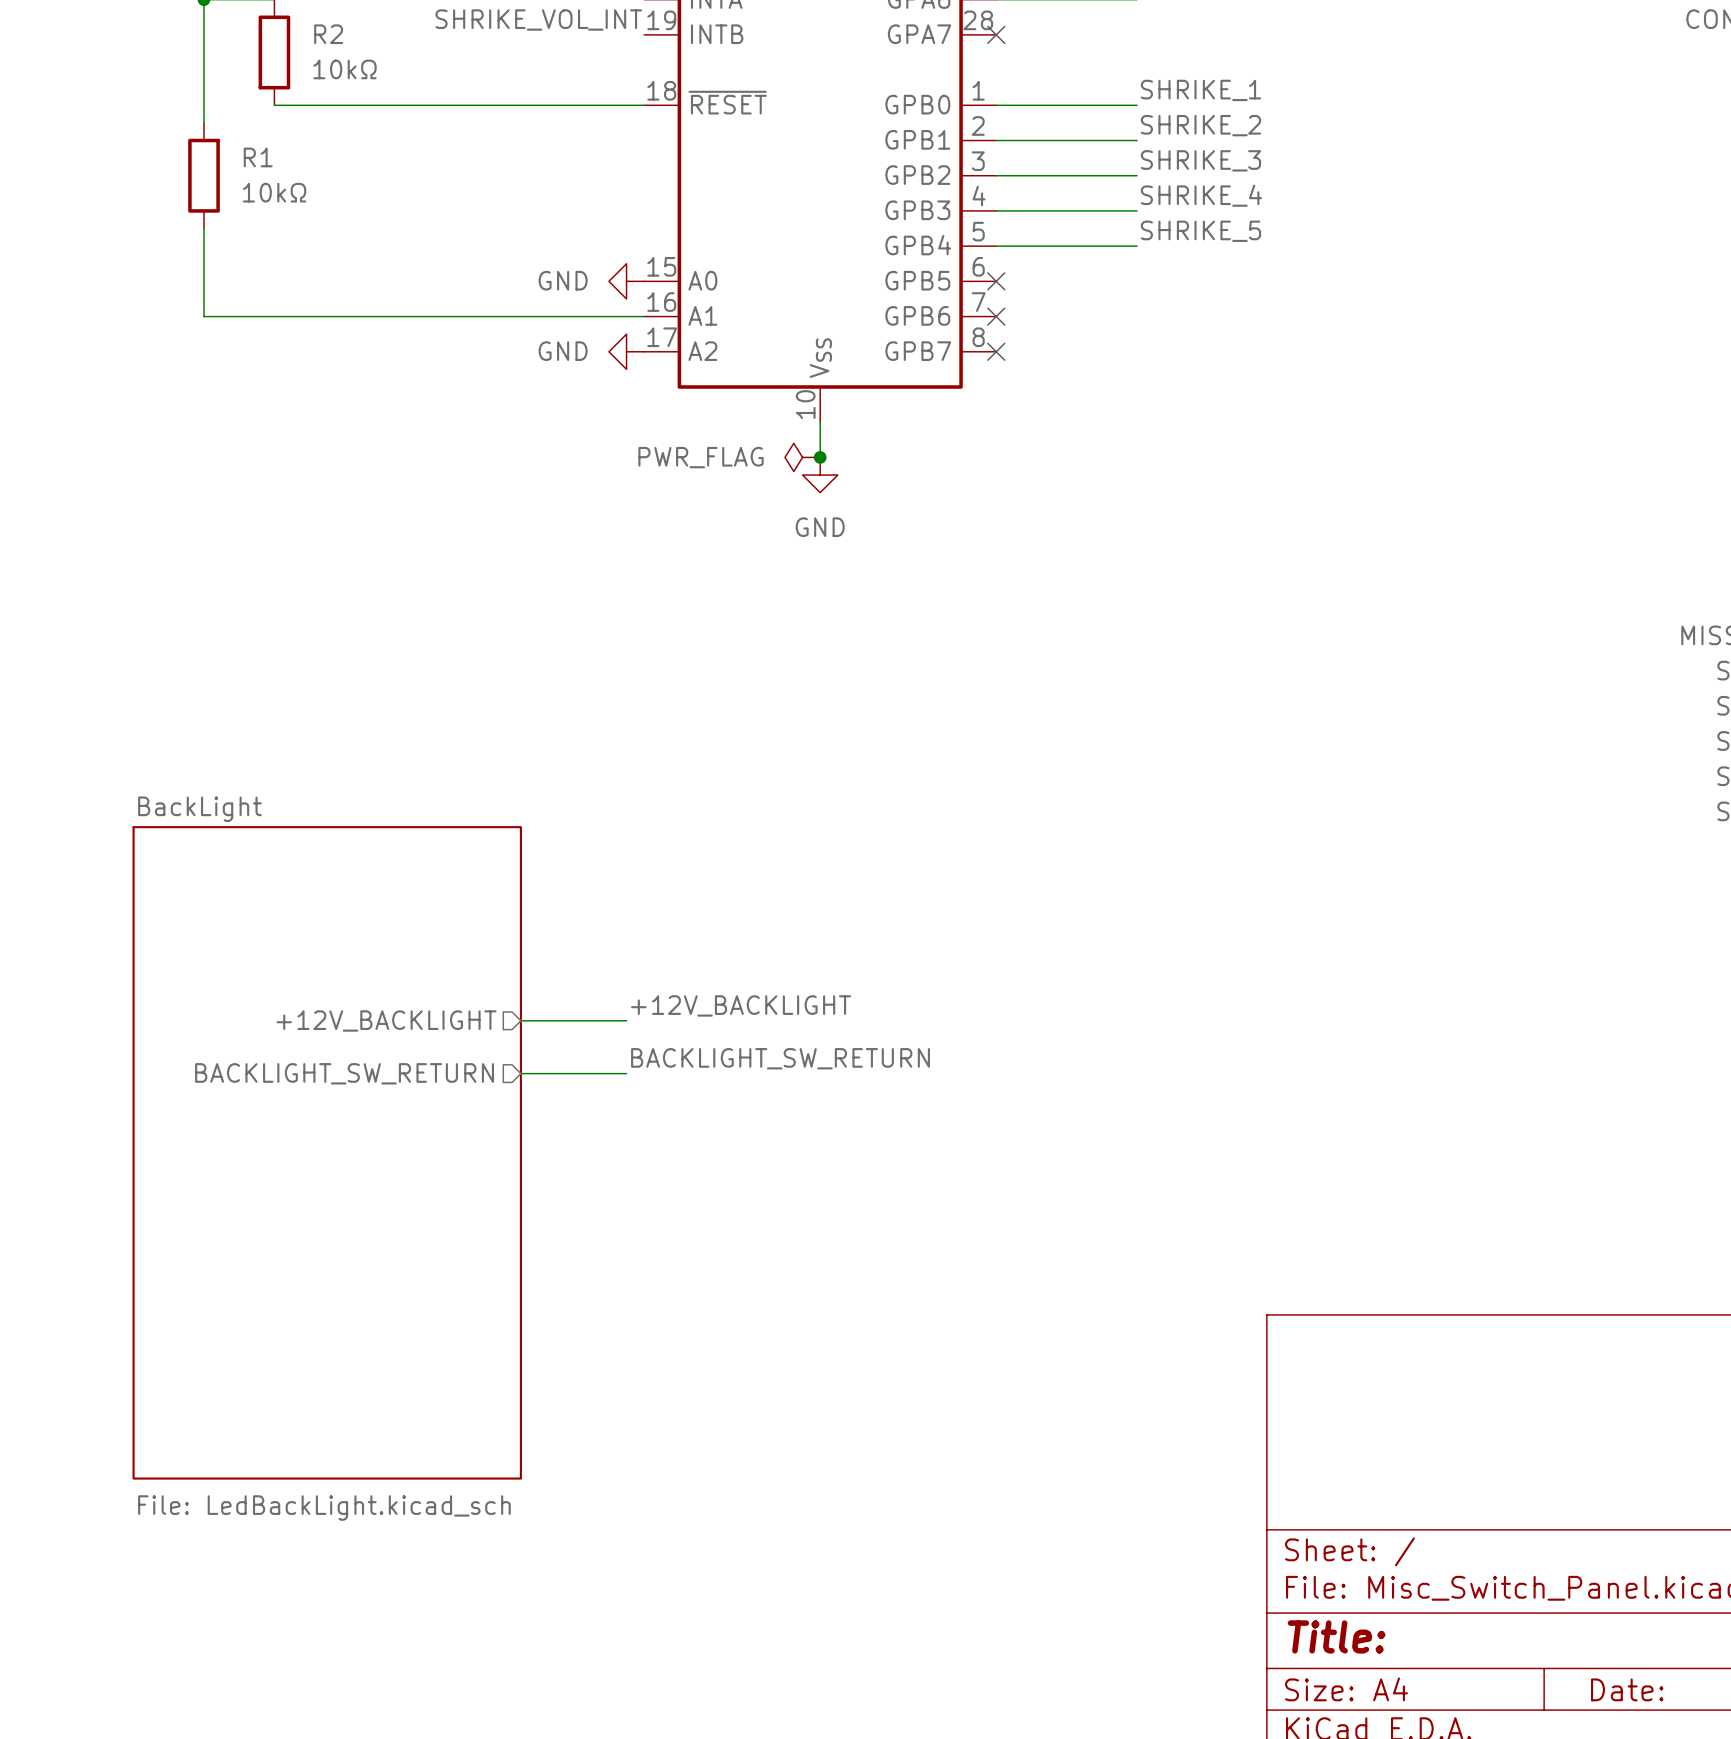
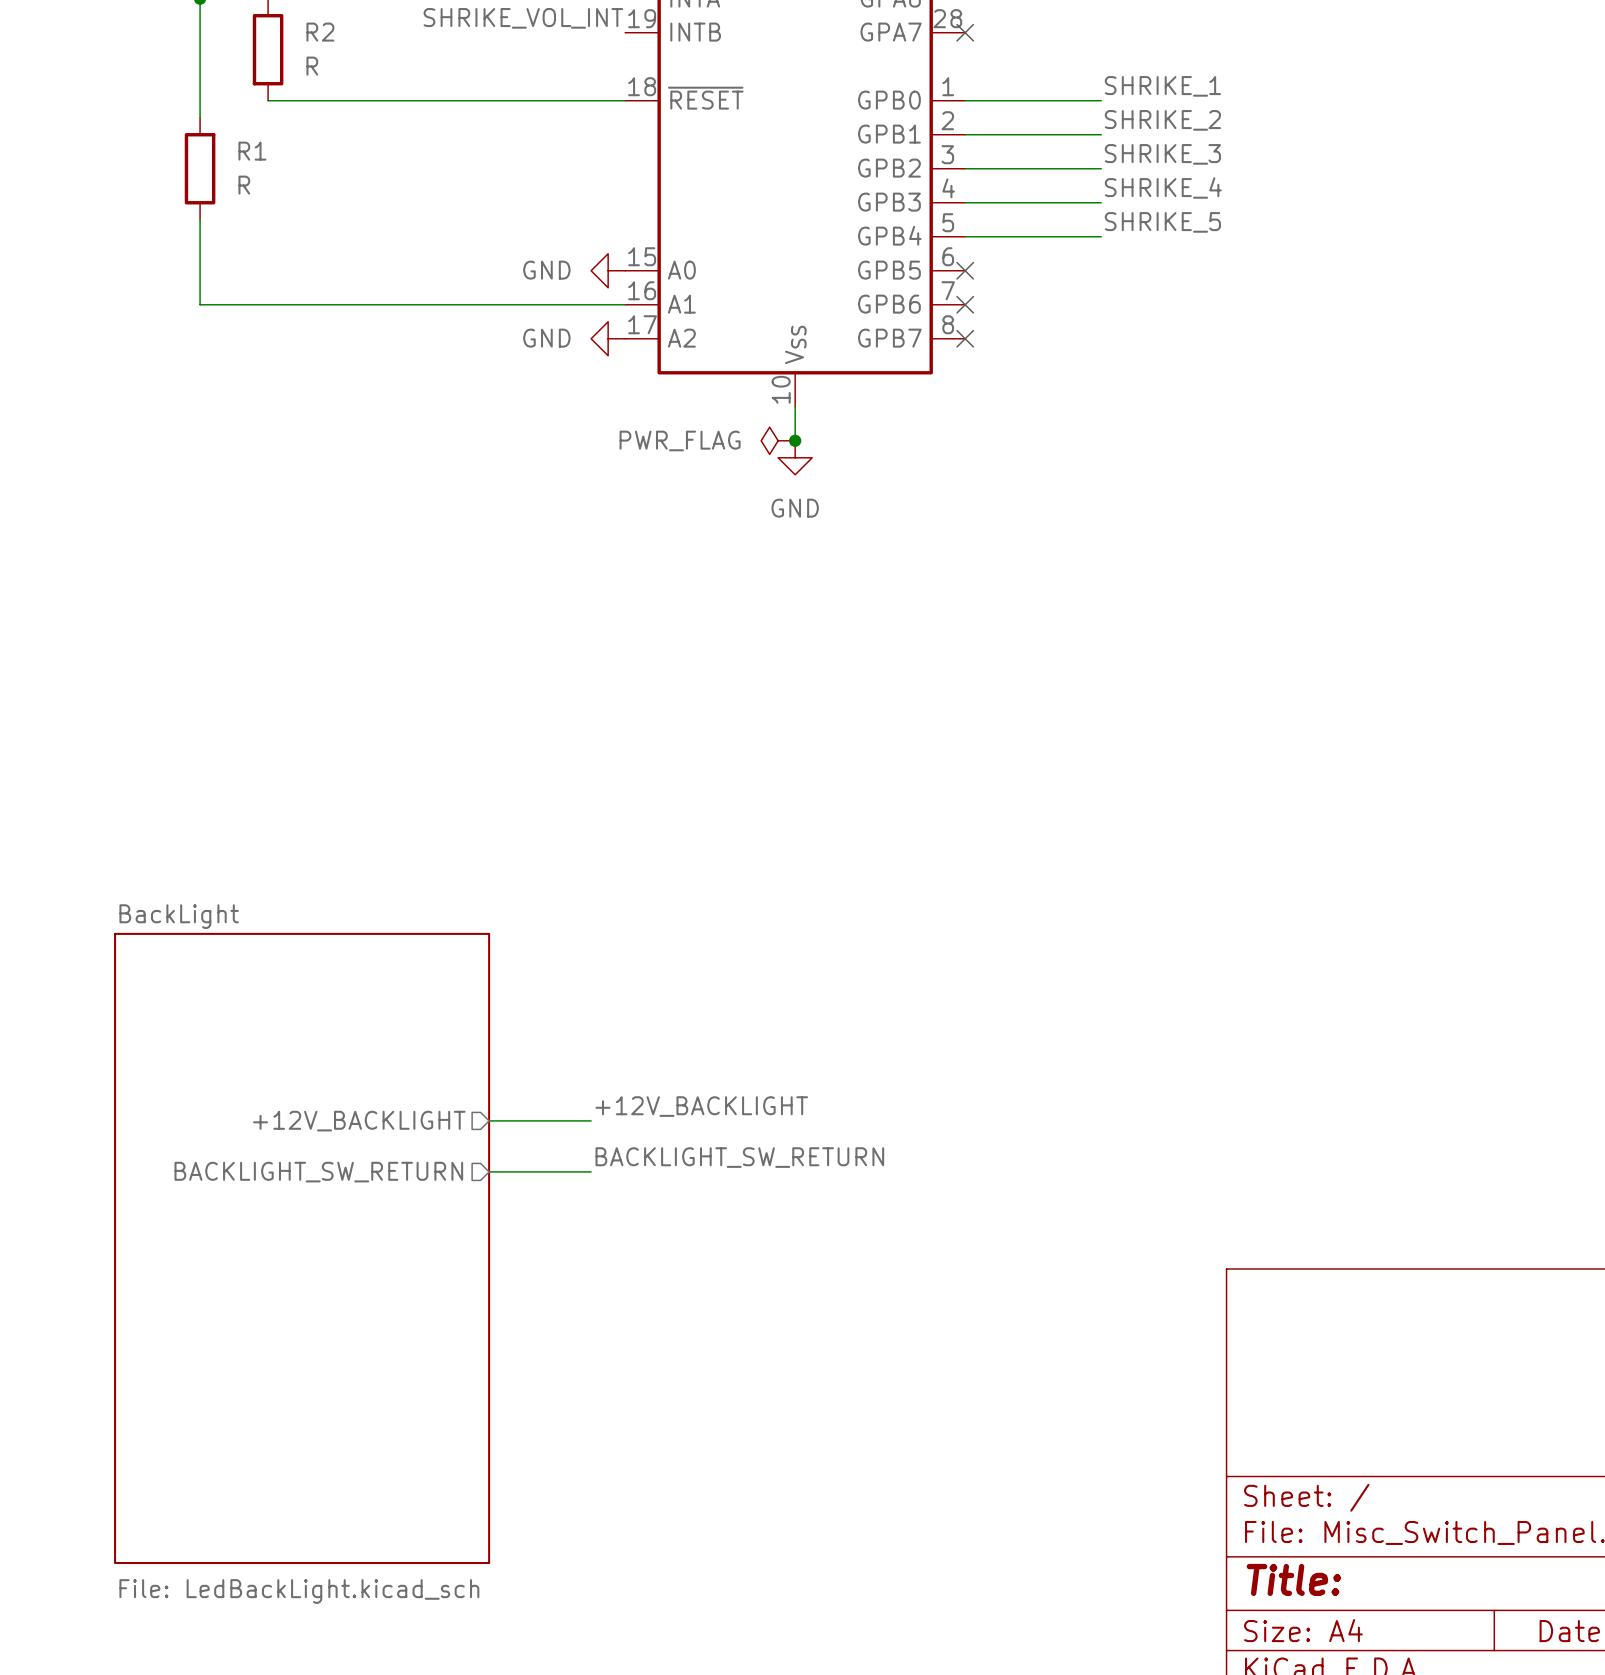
R2 value: 10kΩ (344, 69) -> R (312, 66)
R1 value: 10kΩ (274, 192) -> R (244, 185)
label position: +12V_BACKLIGHT (741, 1005) -> +12V_BACKLIGHT (701, 1106)
sheet pin position: +12V_BACKLIGHT (386, 1020) -> +12V_BACKLIGHT (359, 1121)
wire: (520, 1020) (626, 1020) -> (489, 1171) (591, 1171)
label position: BACKLIGHT_SW_RETURN (780, 1058) -> BACKLIGHT_SW_RETURN (739, 1157)
sheet pin position: BACKLIGHT_SW_RETURN (344, 1073) -> BACKLIGHT_SW_RETURN (318, 1172)
wire: (520, 1073) (626, 1073) -> (489, 1120) (591, 1120)
sheet BackLight position: (327, 1152) -> (302, 1248)

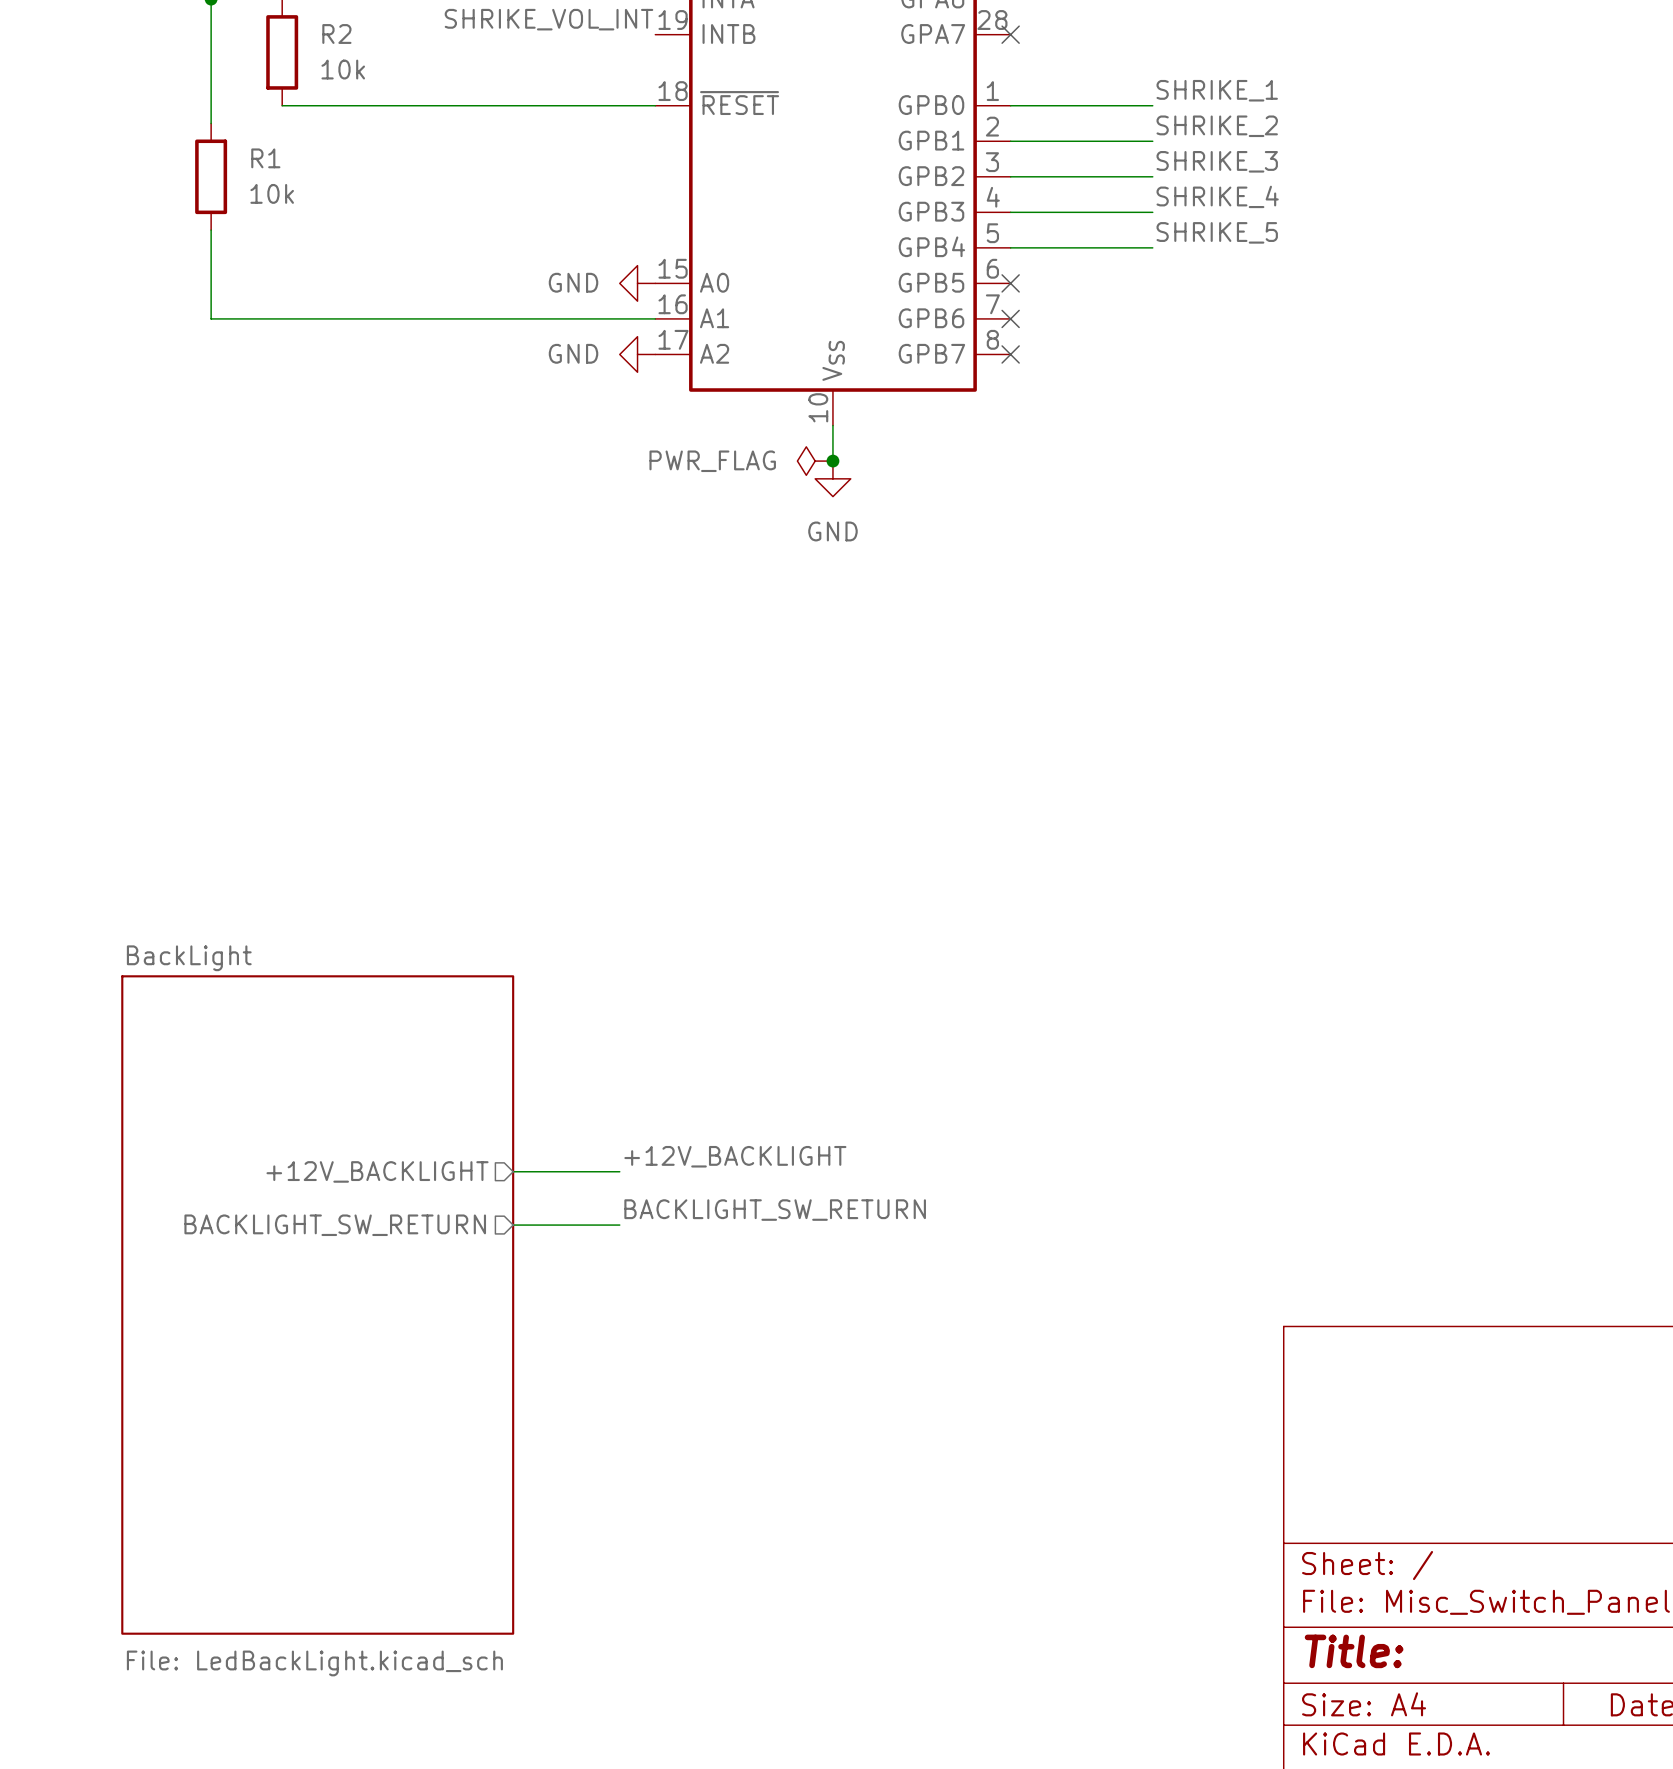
R2 value: R (312, 66) -> 10k (343, 69)
R1 value: R (244, 185) -> 10k (272, 193)

